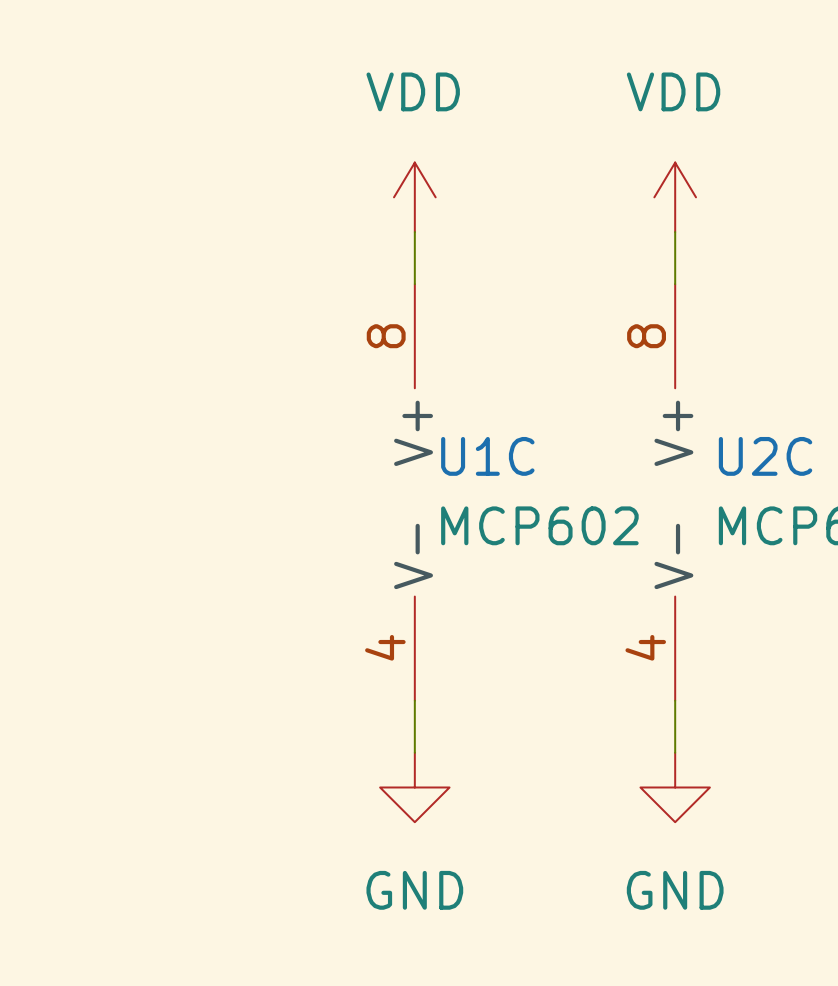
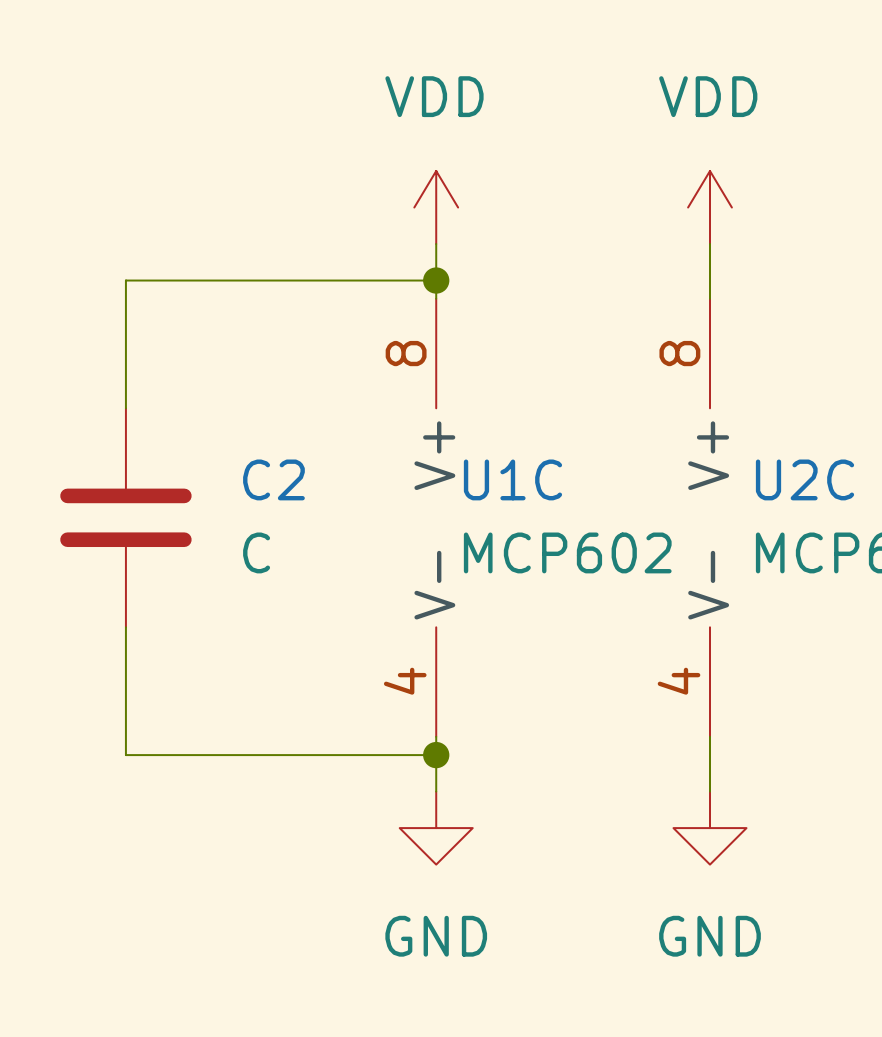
wire: none -> (436, 280) (125, 280) (125, 408)
junction: none -> (436, 280)
C2: none -> C (125, 517)
wire: none -> (125, 627) (125, 755) (436, 755)
junction: none -> (436, 755)

